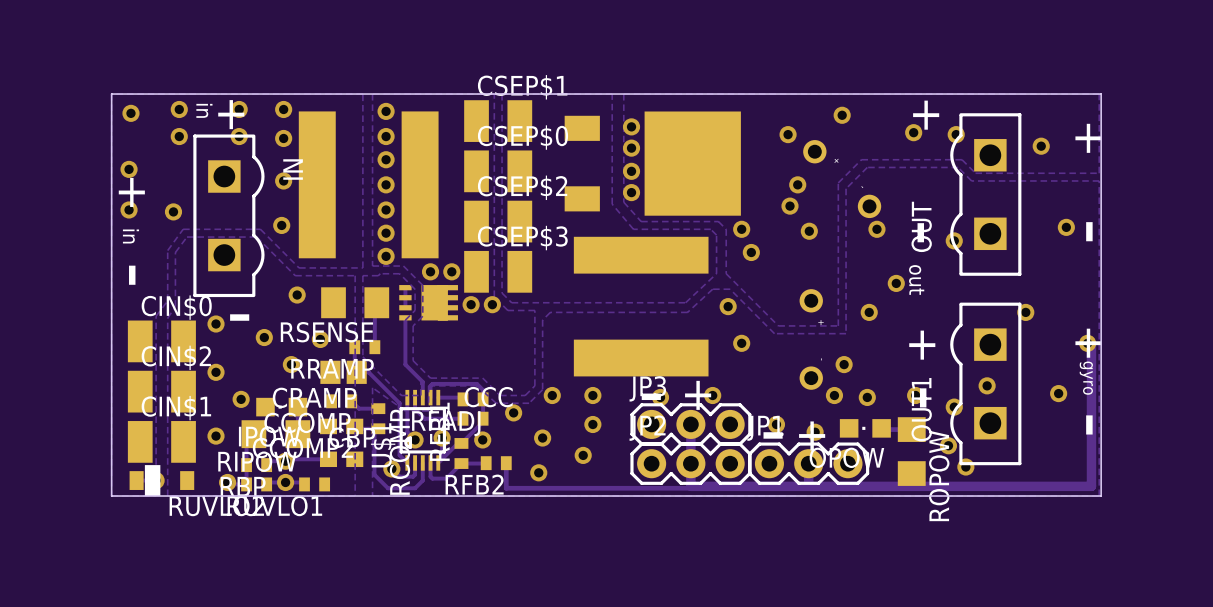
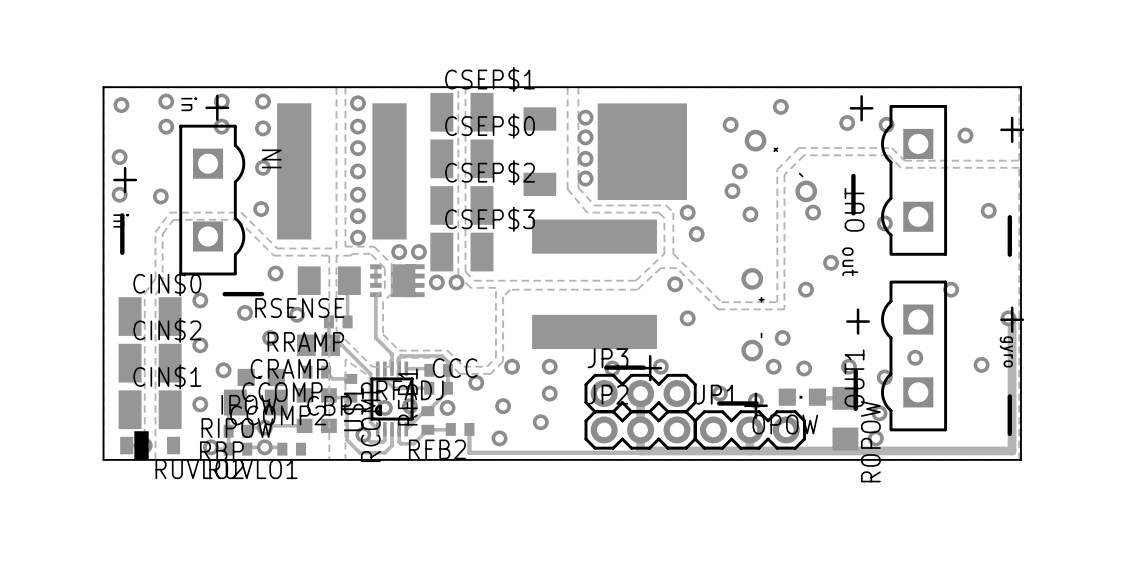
via position: (965, 467) -> (875, 438)

